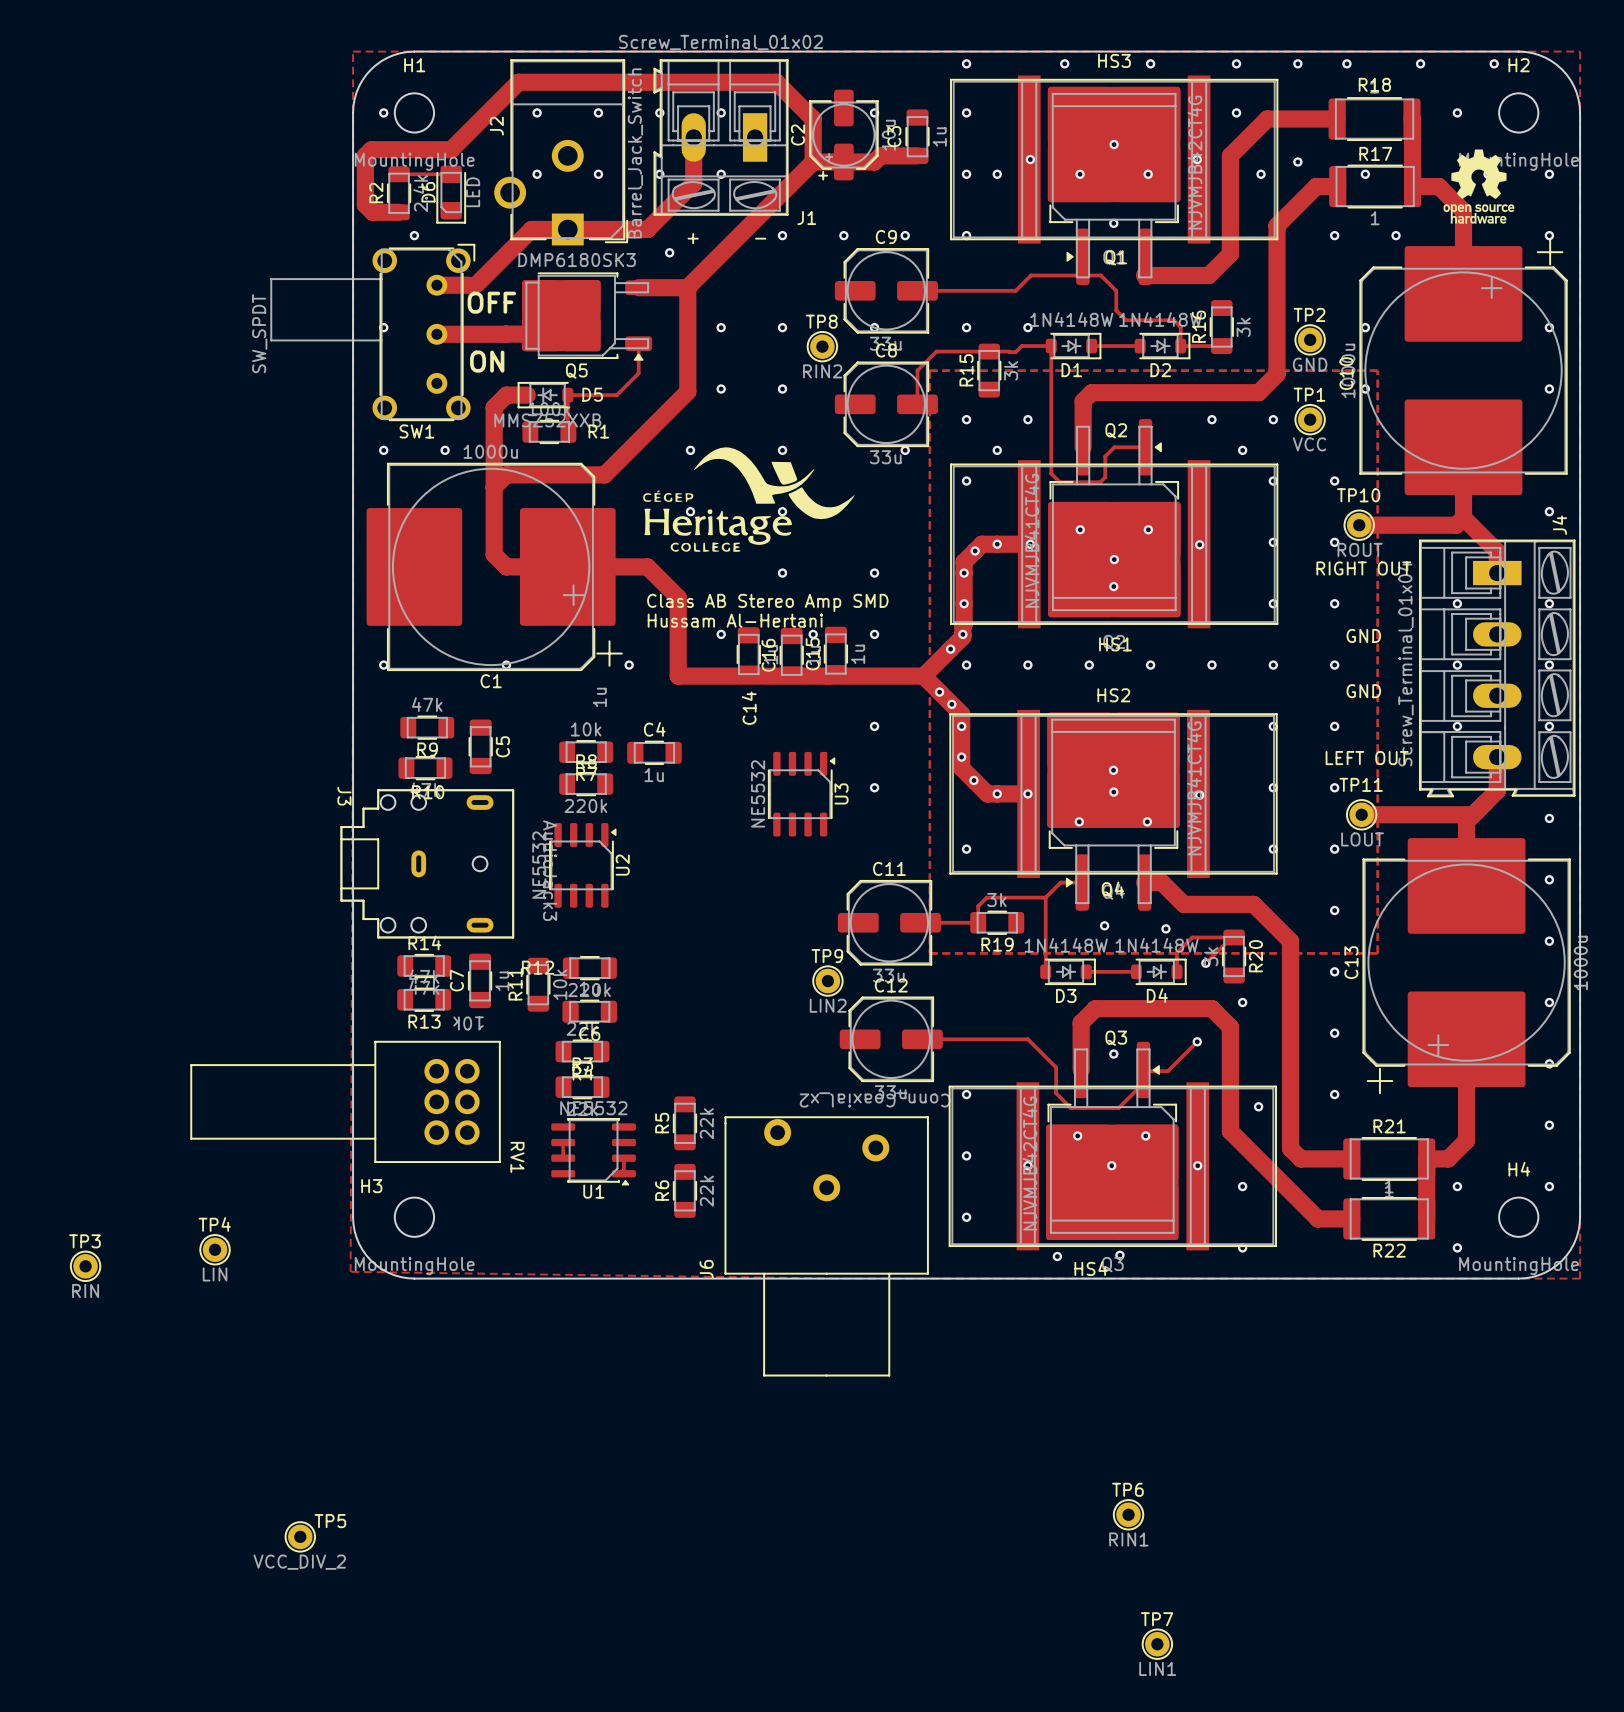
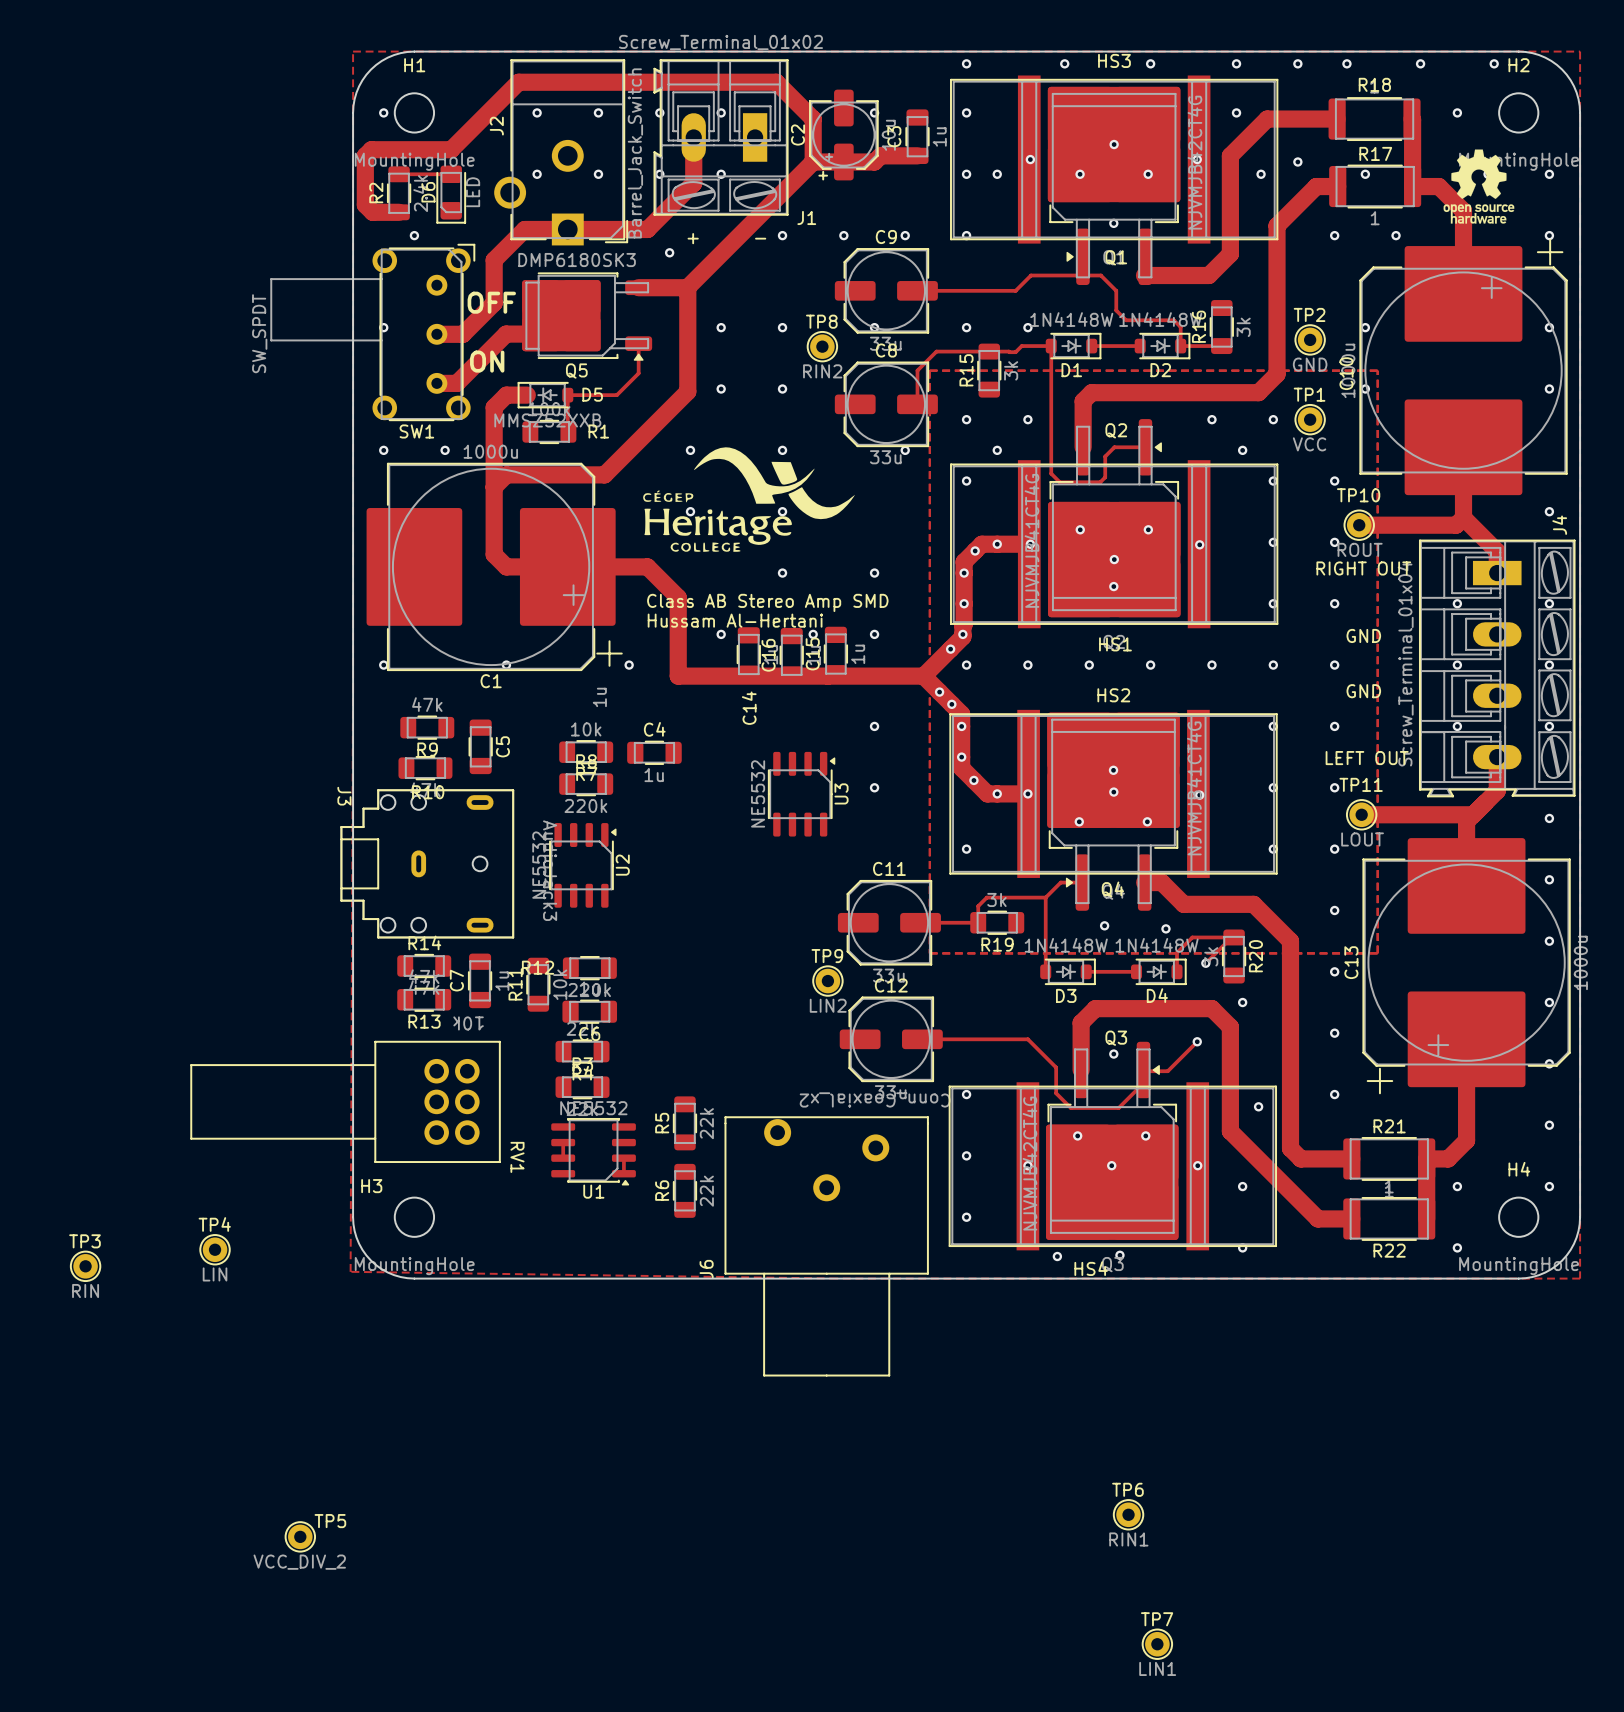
track: (531, 229) (476, 284) -> (531, 229) (524, 229) (494, 260) (494, 303) (462, 334)
track: (436, 285) (469, 285) -> none
track: (462, 334) (505, 334) -> (436, 383) (456, 383) (505, 334)

